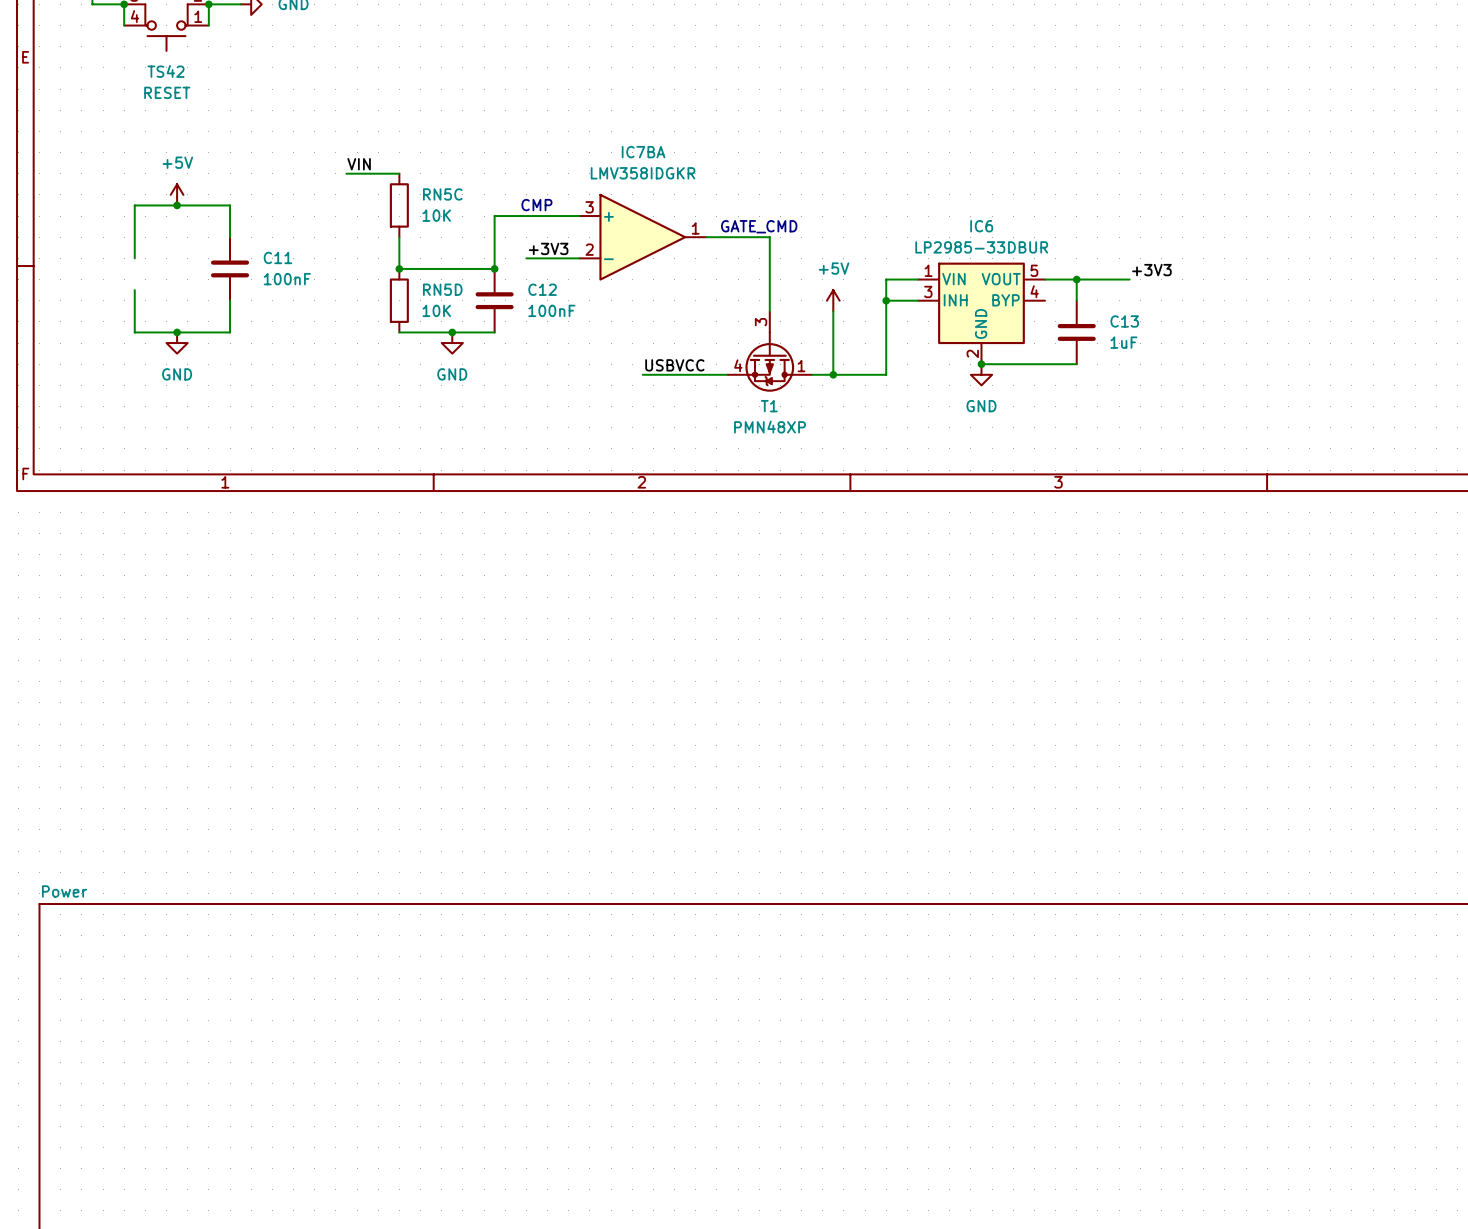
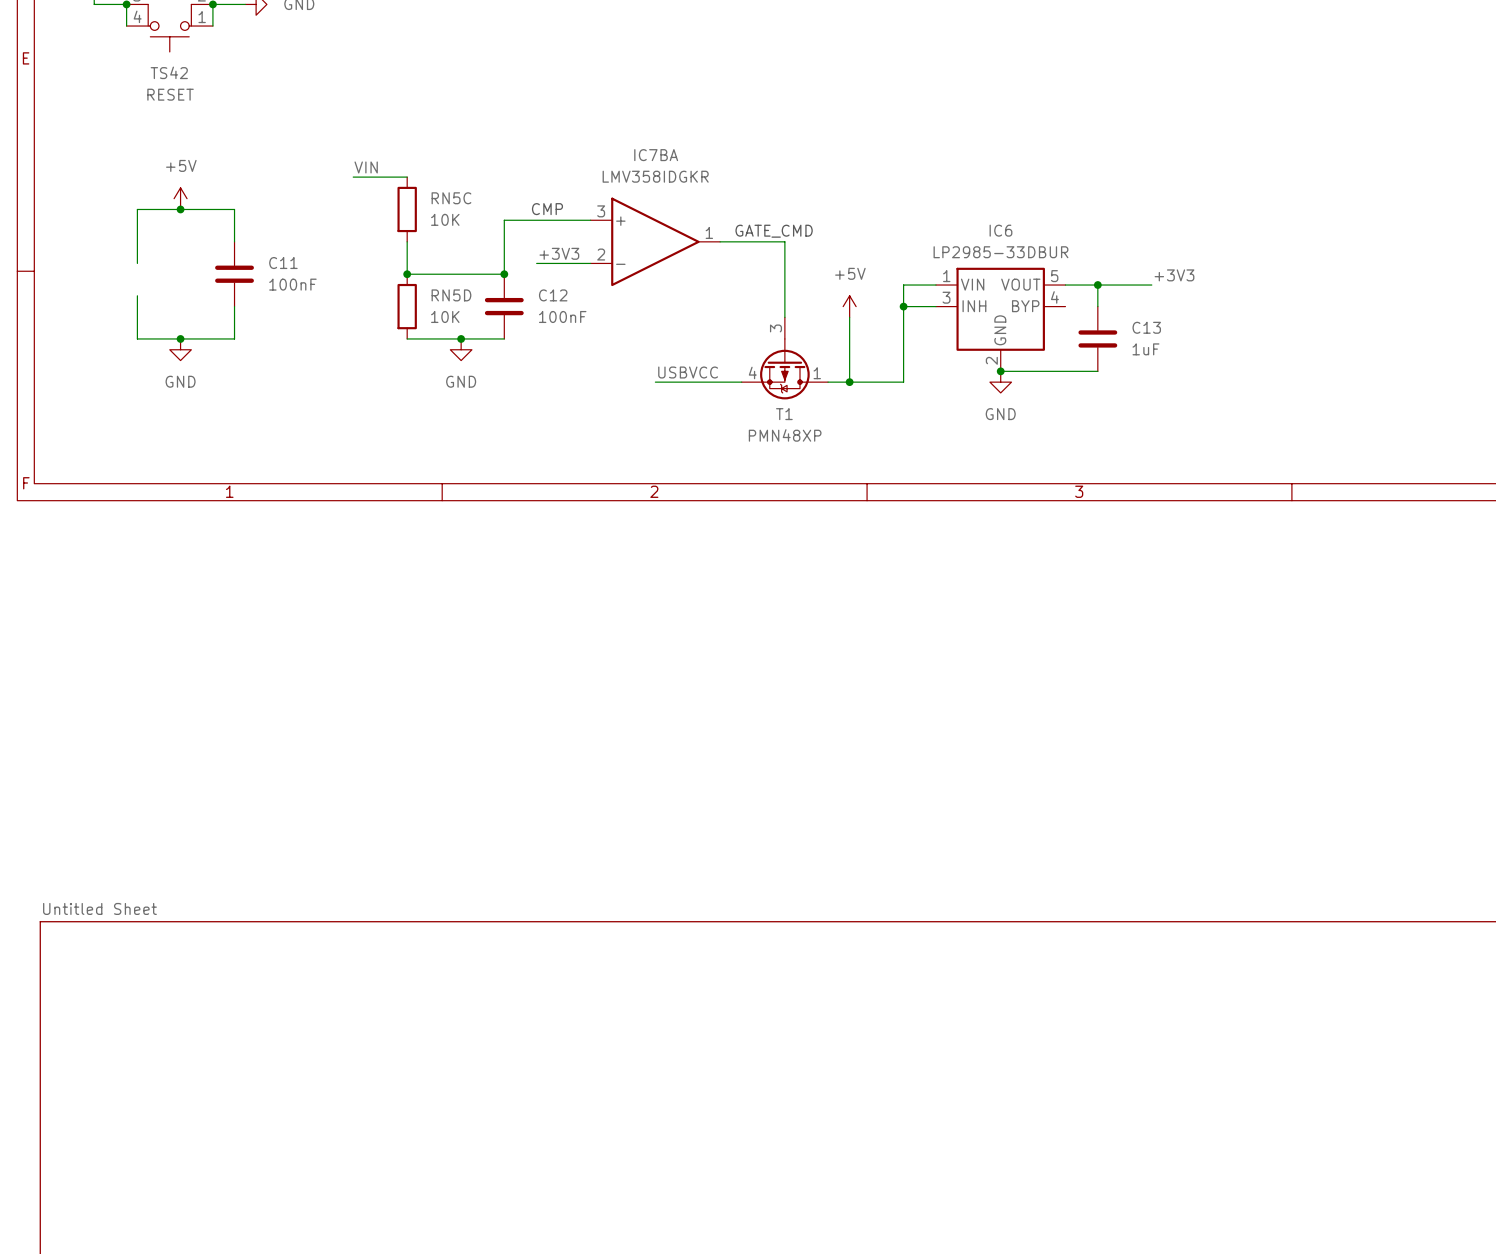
sheet Power name: Power (64, 891) -> Untitled Sheet (99, 908)

